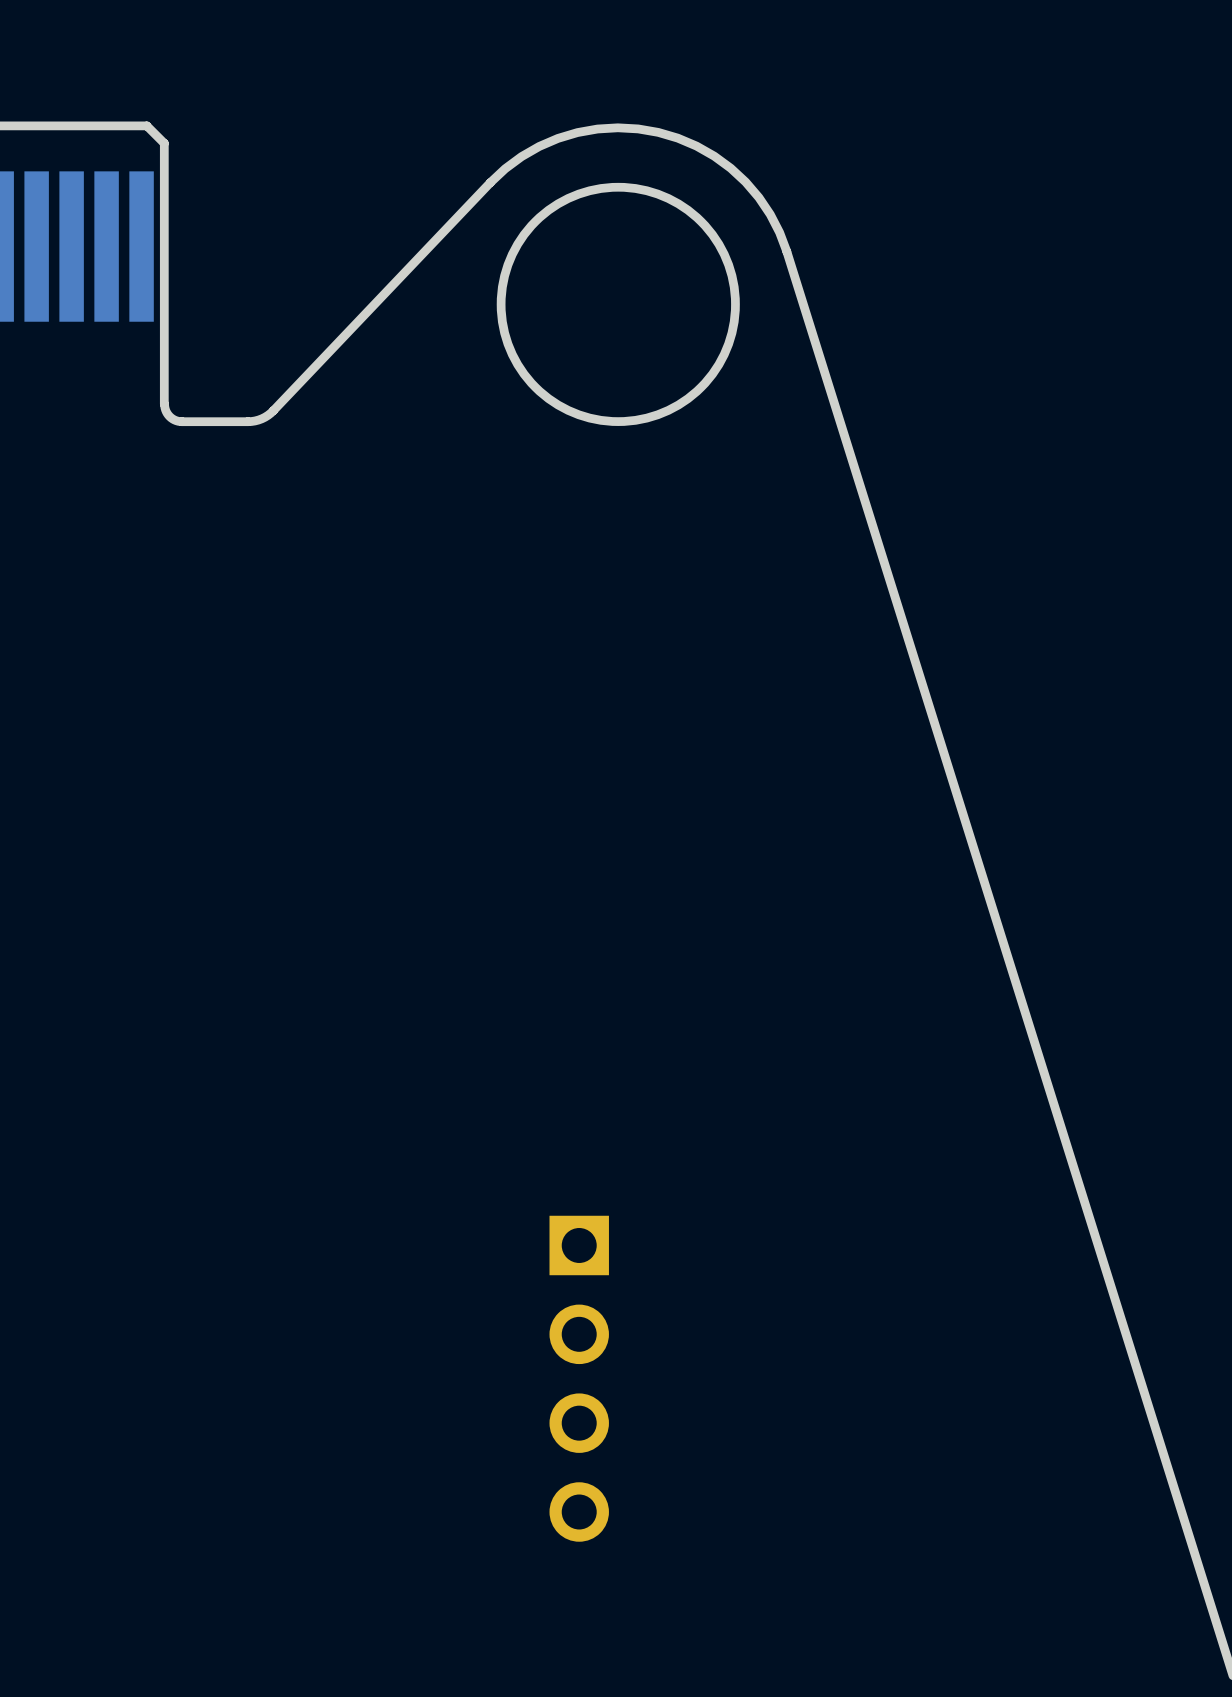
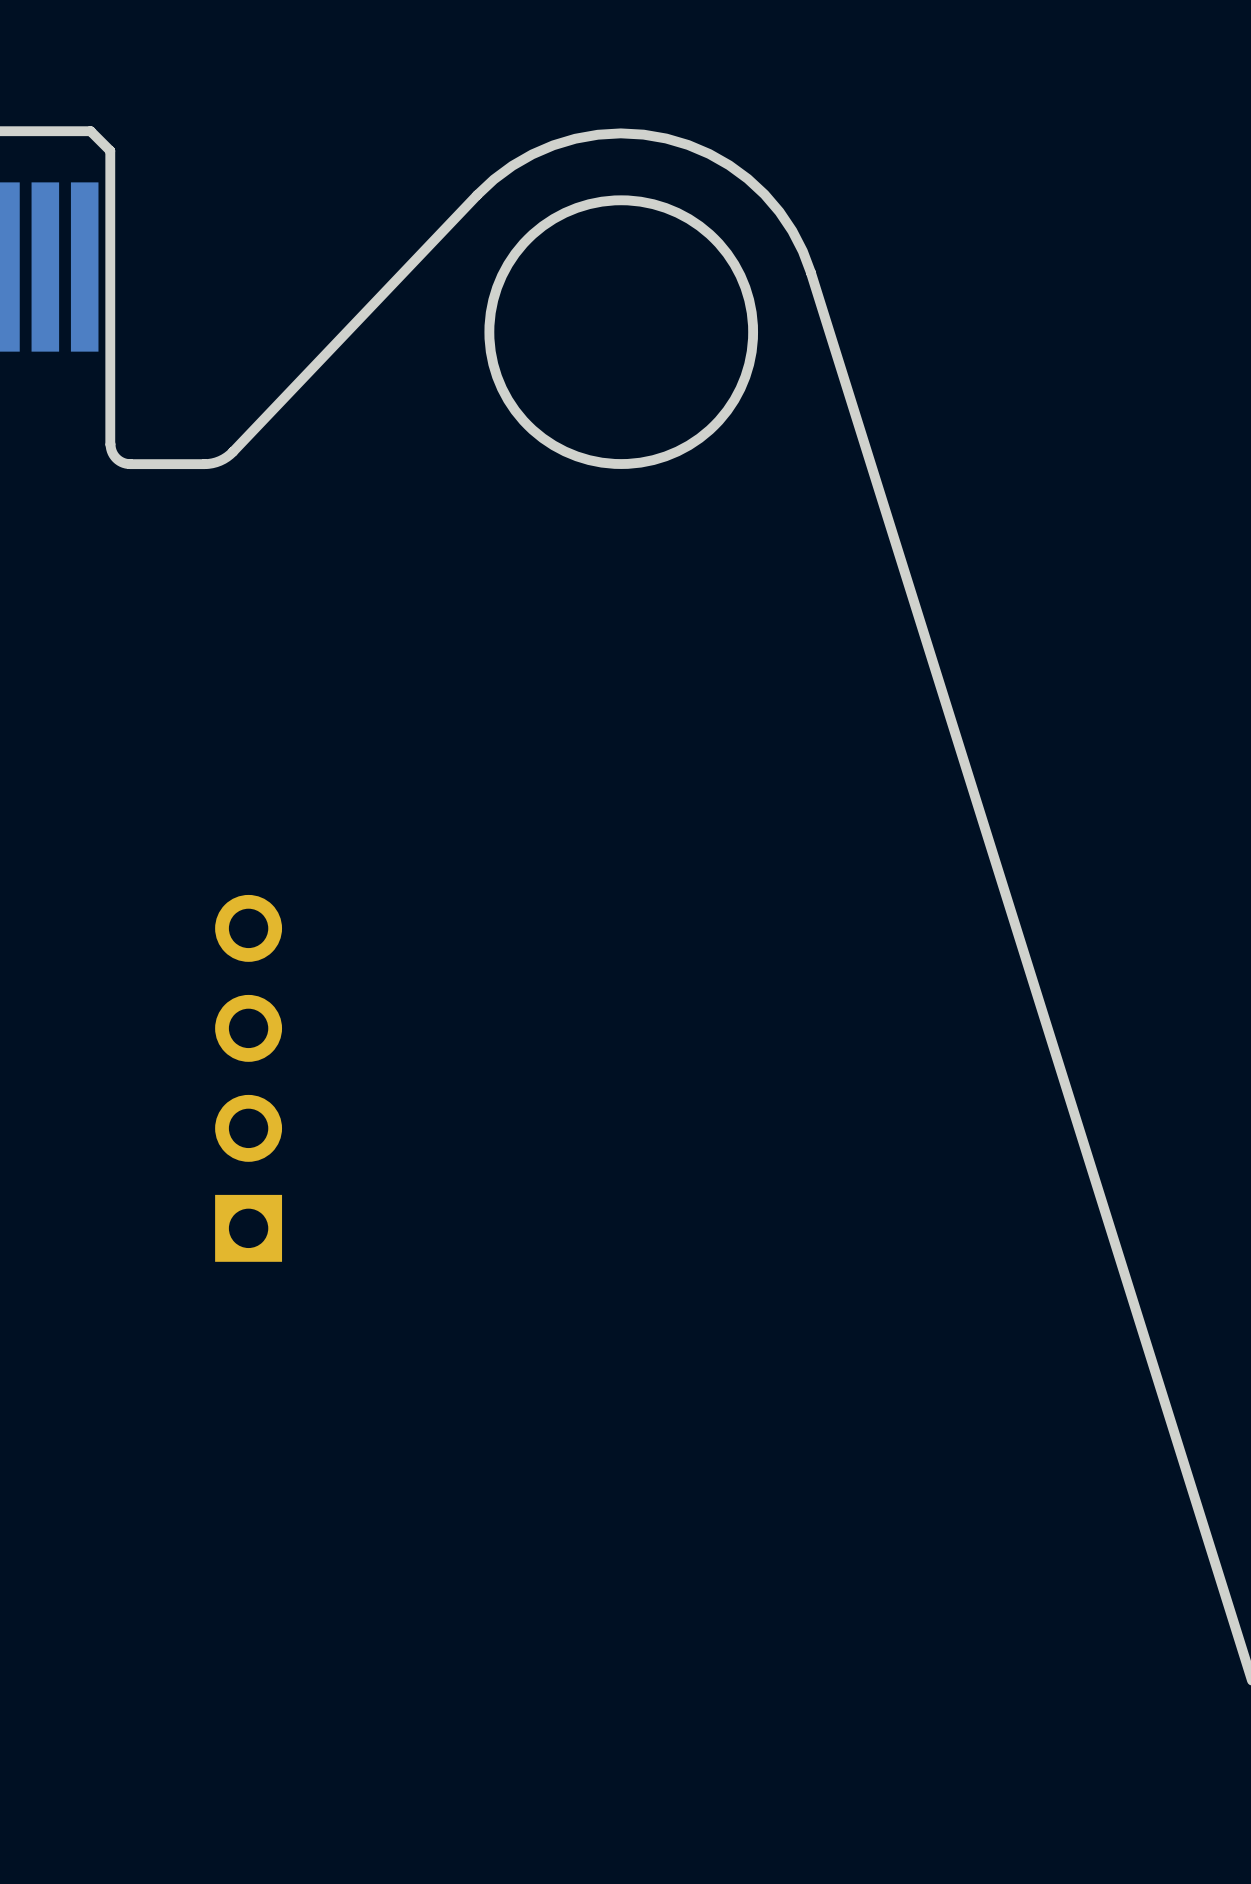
part rotation: 0° (579, 1378) -> 180° (248, 1078)
part position: (579, 1378) -> (248, 1078)

